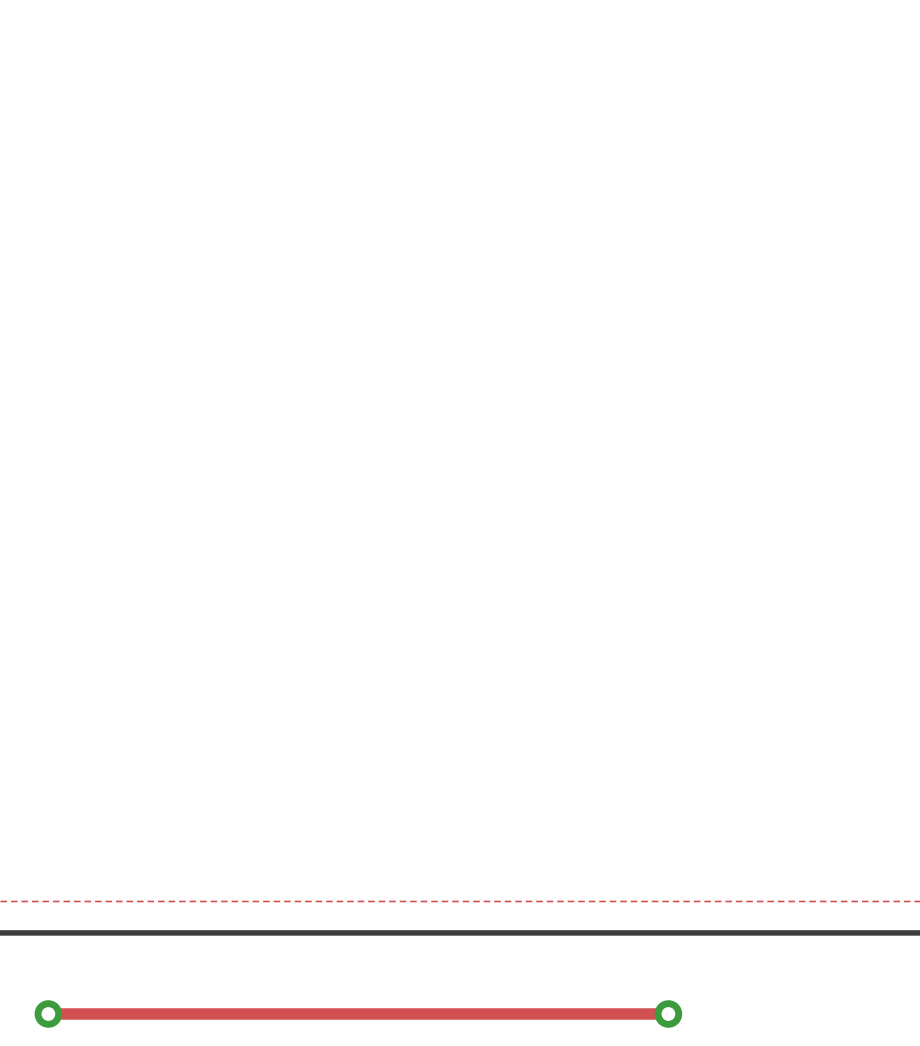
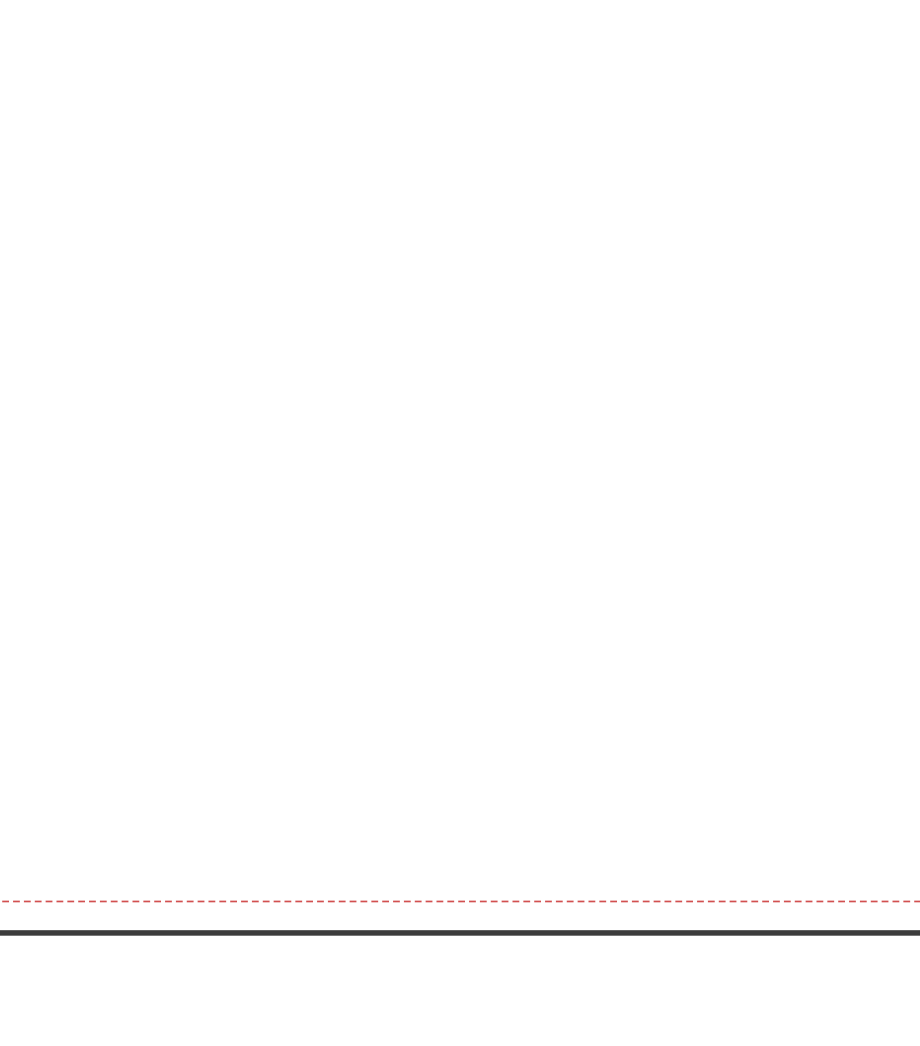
track: (48, 1014) (668, 1014) -> none
via: (48, 1014) -> none
via: (668, 1014) -> none

